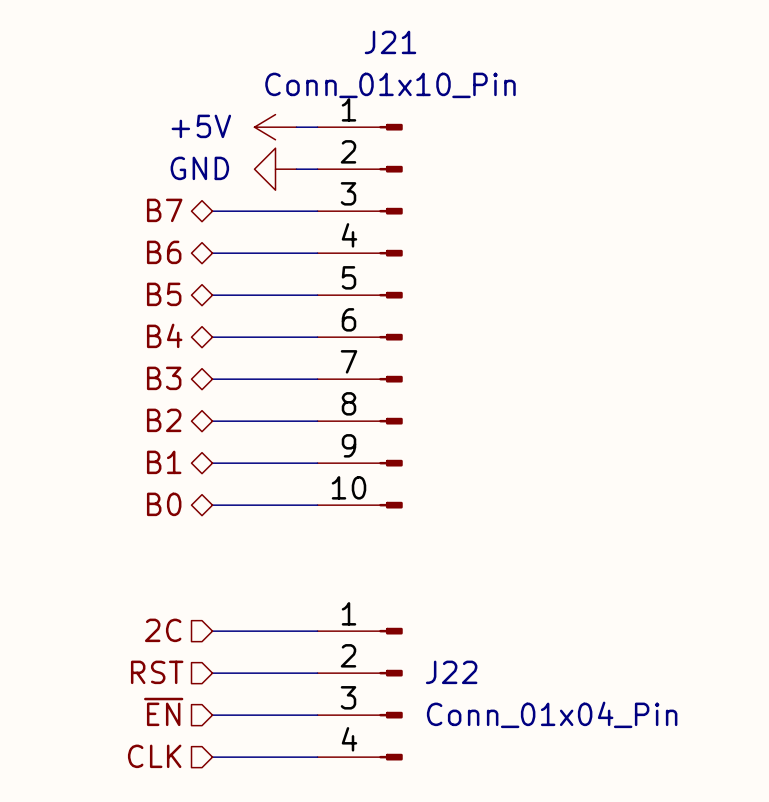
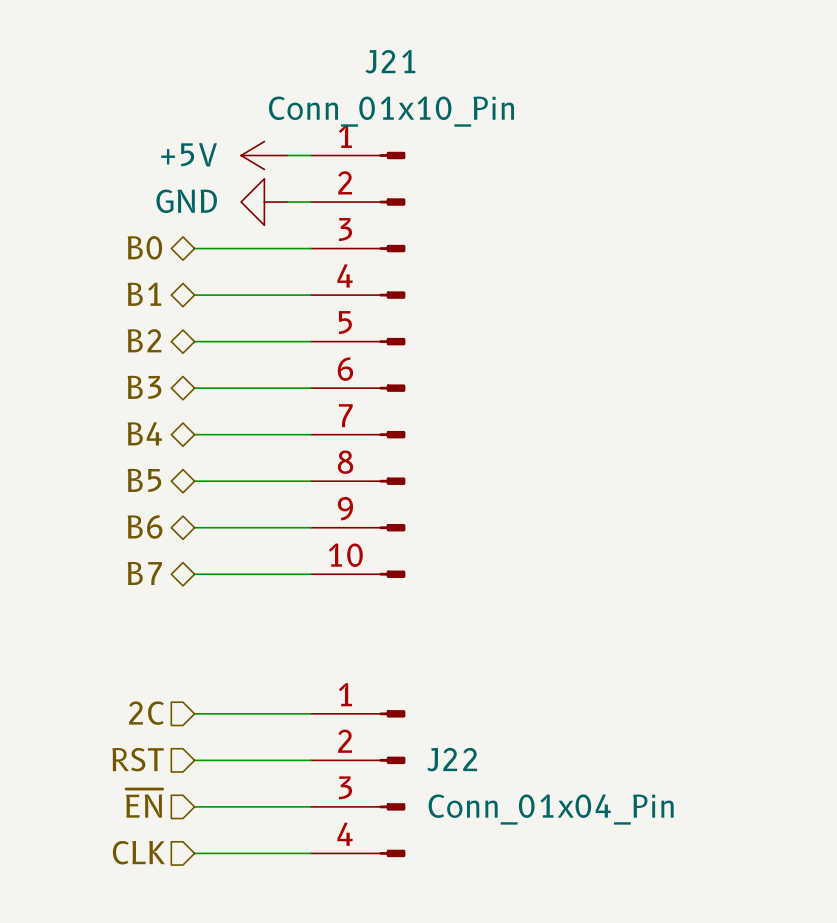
hierarchical label: B7 (164, 210) -> B0 (144, 247)
hierarchical label: B6 (164, 252) -> B1 (144, 294)
hierarchical label: B5 (164, 294) -> B2 (144, 340)
hierarchical label: B4 (164, 335) -> B3 (144, 387)
hierarchical label: B3 (164, 378) -> B4 (144, 433)
hierarchical label: B2 (164, 420) -> B5 (144, 480)
hierarchical label: B1 (164, 462) -> B6 (145, 527)
hierarchical label: B0 (164, 504) -> B7 (144, 573)

